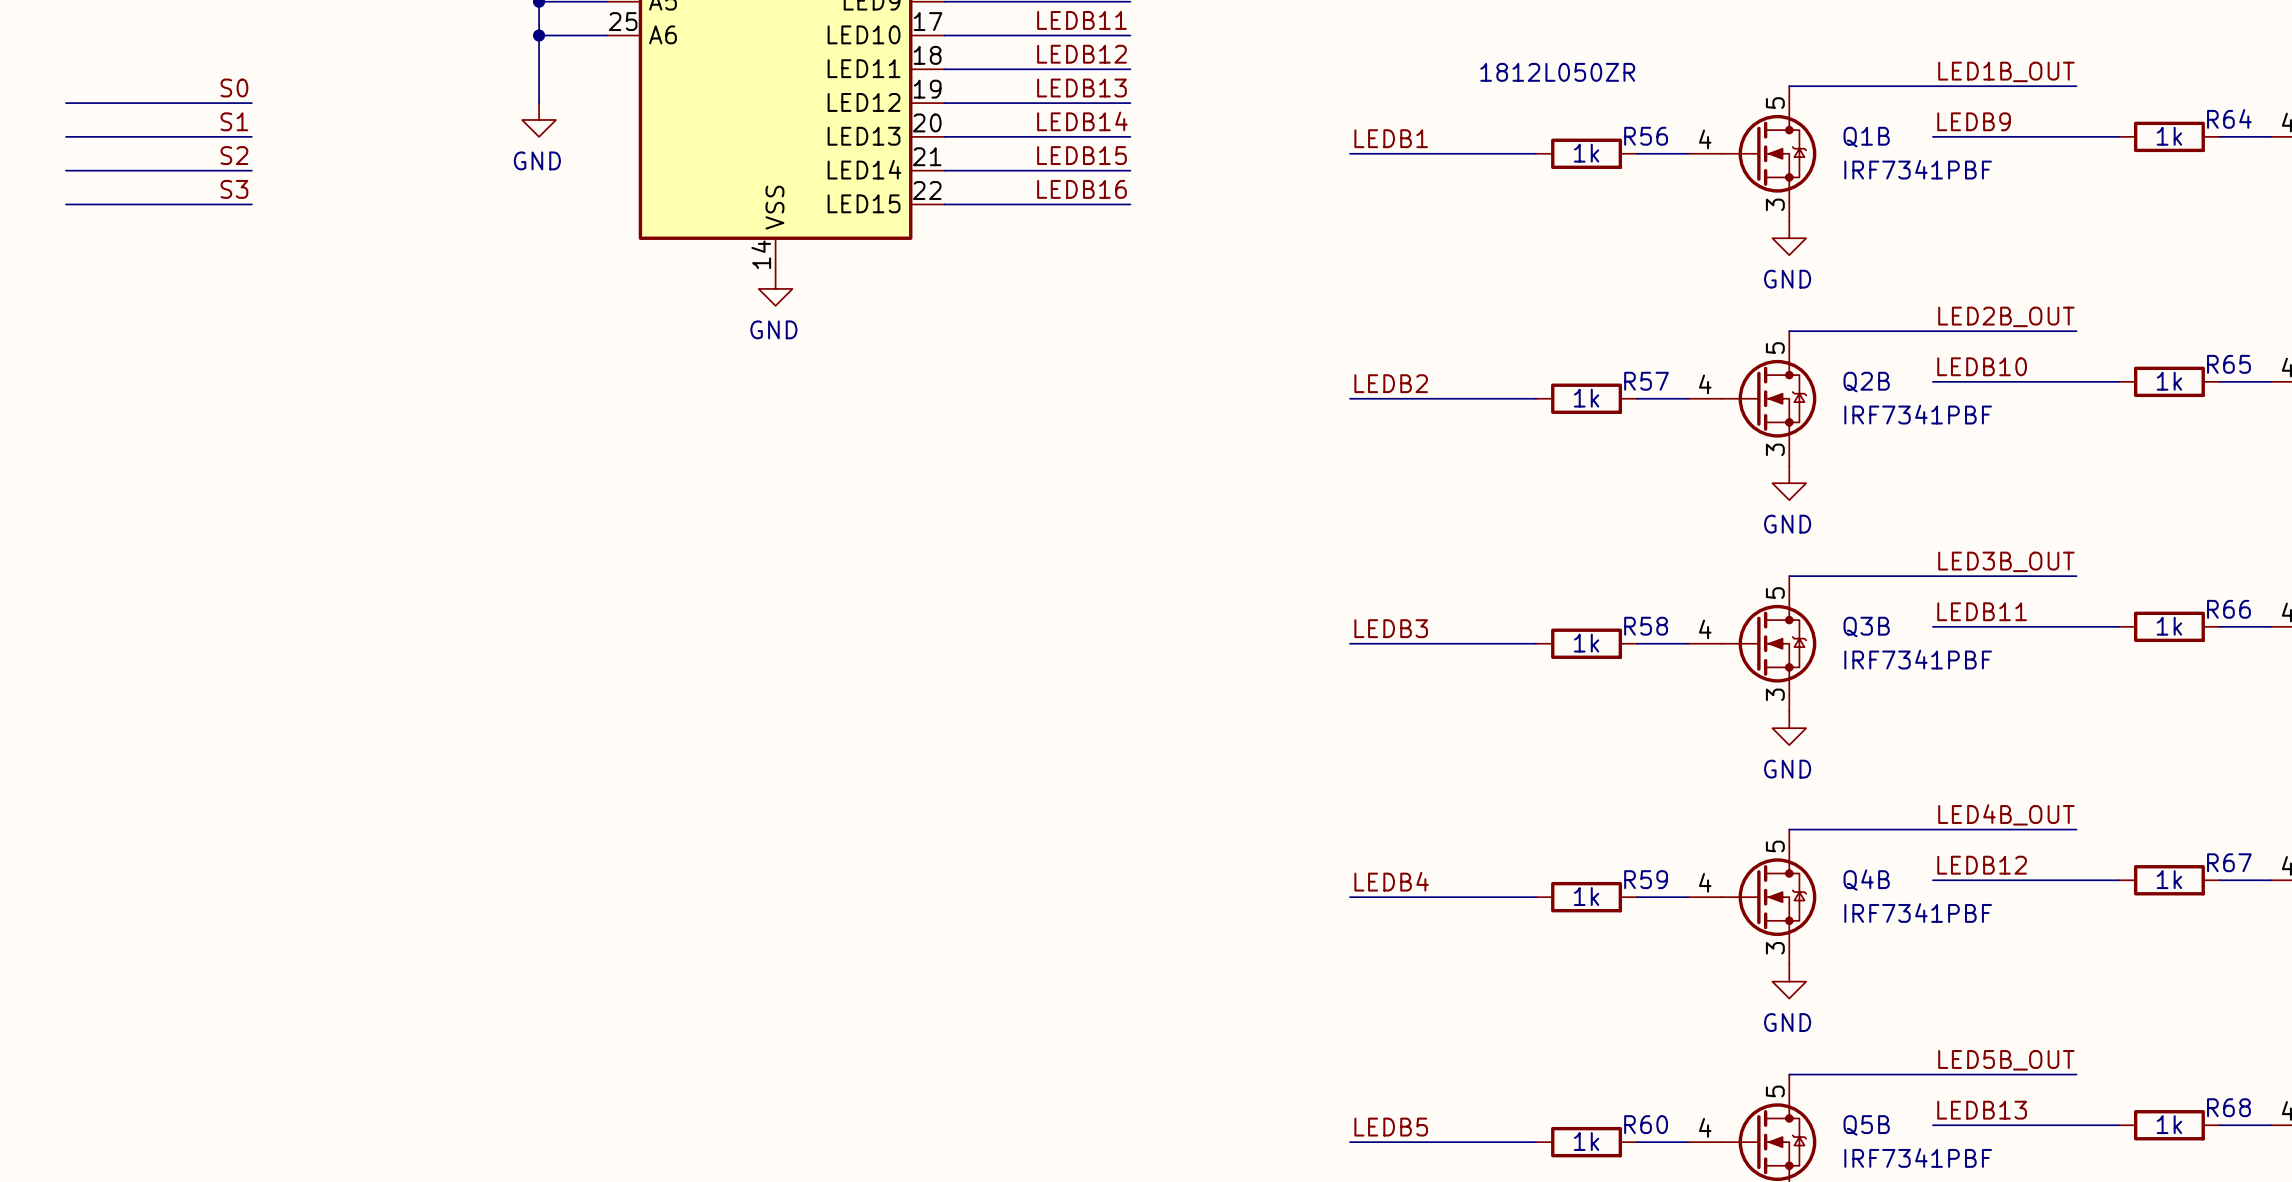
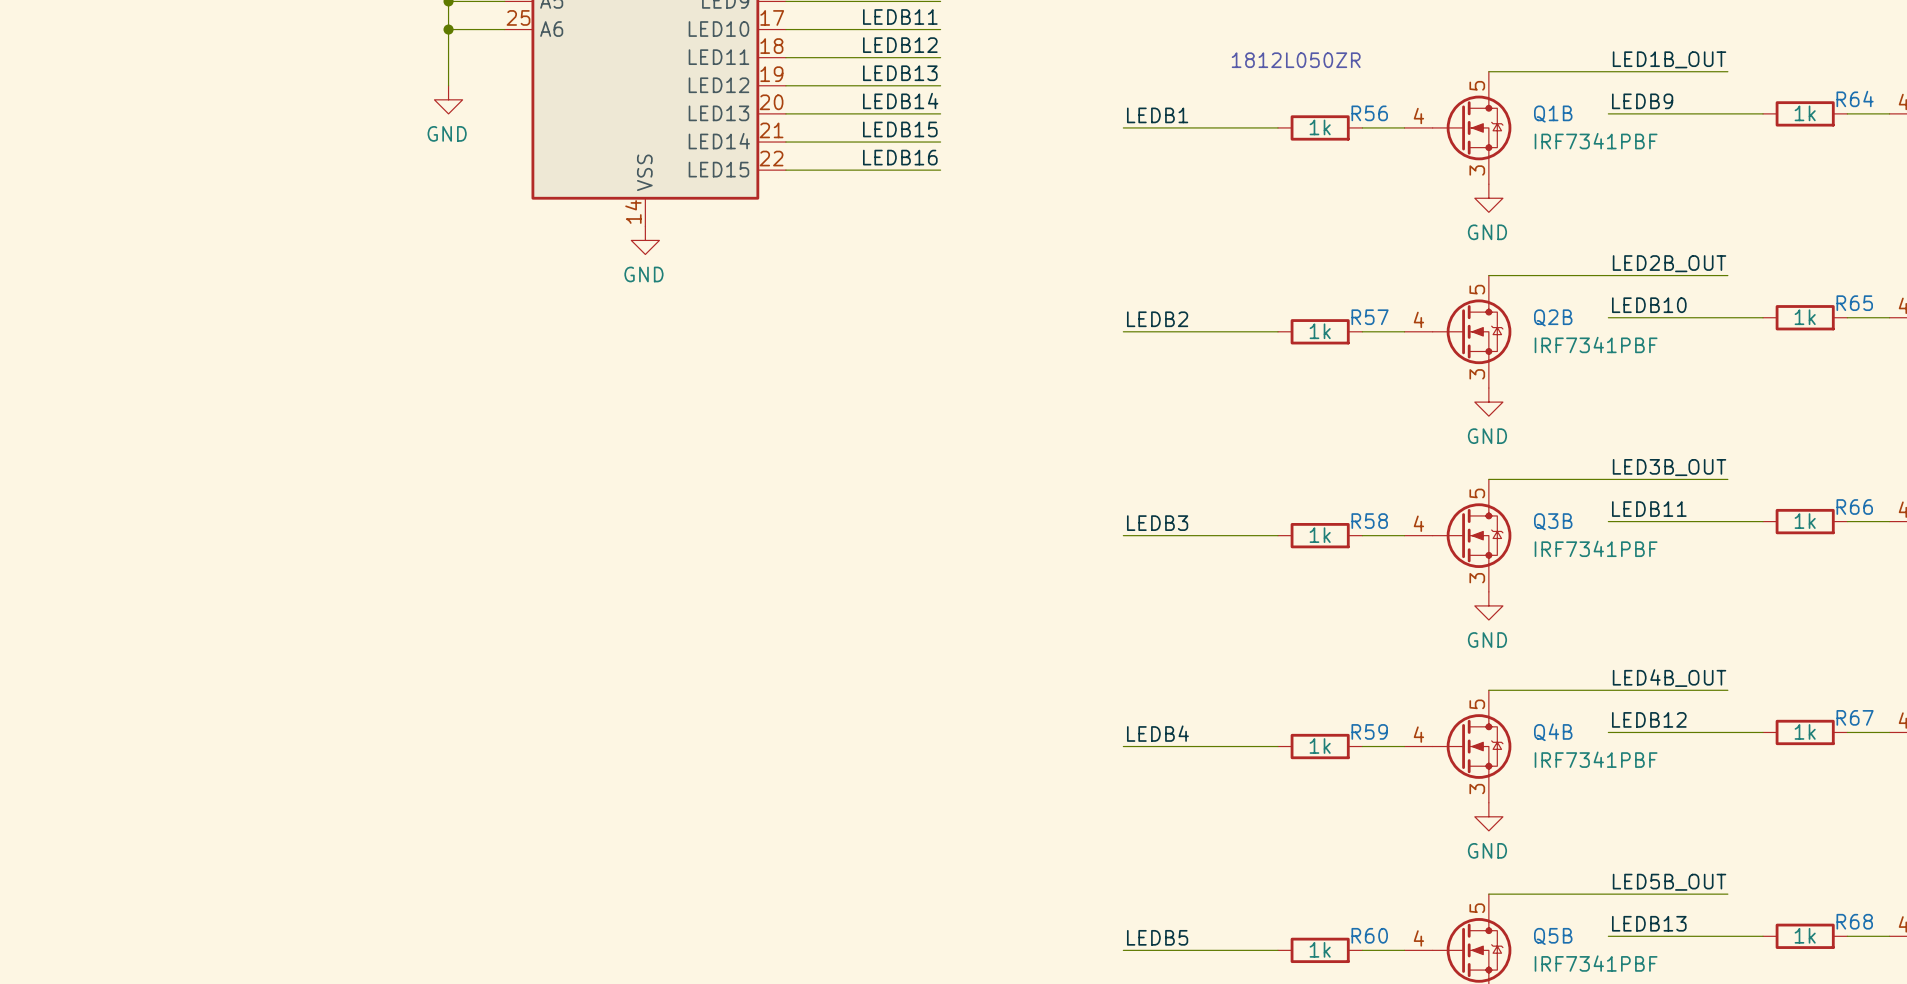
label: S0 (234, 88) -> none
wire: (65, 103) (251, 103) -> none
label: S1 (234, 121) -> none
wire: (65, 136) (251, 136) -> none
label: S2 (234, 155) -> none
wire: (65, 170) (251, 170) -> none
label: S3 (234, 189) -> none
wire: (65, 204) (251, 204) -> none

